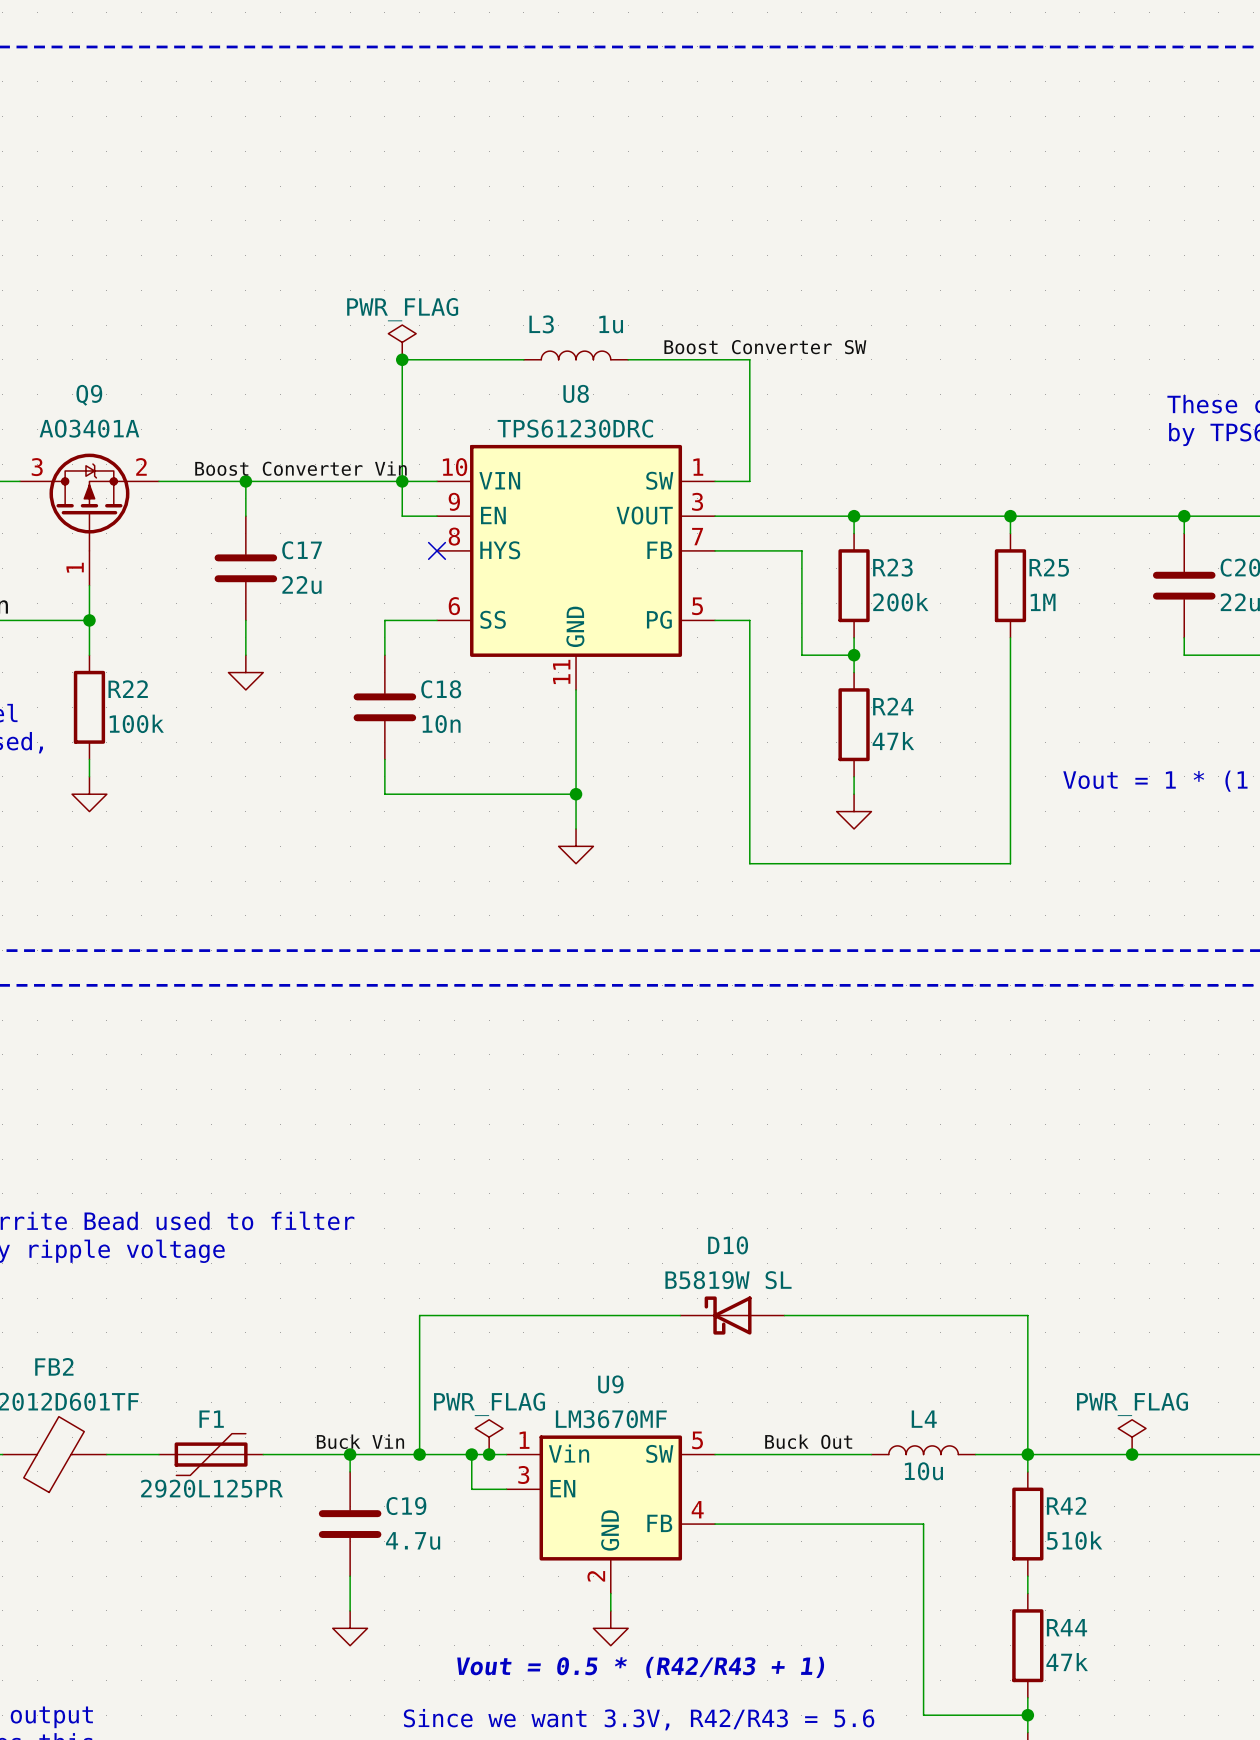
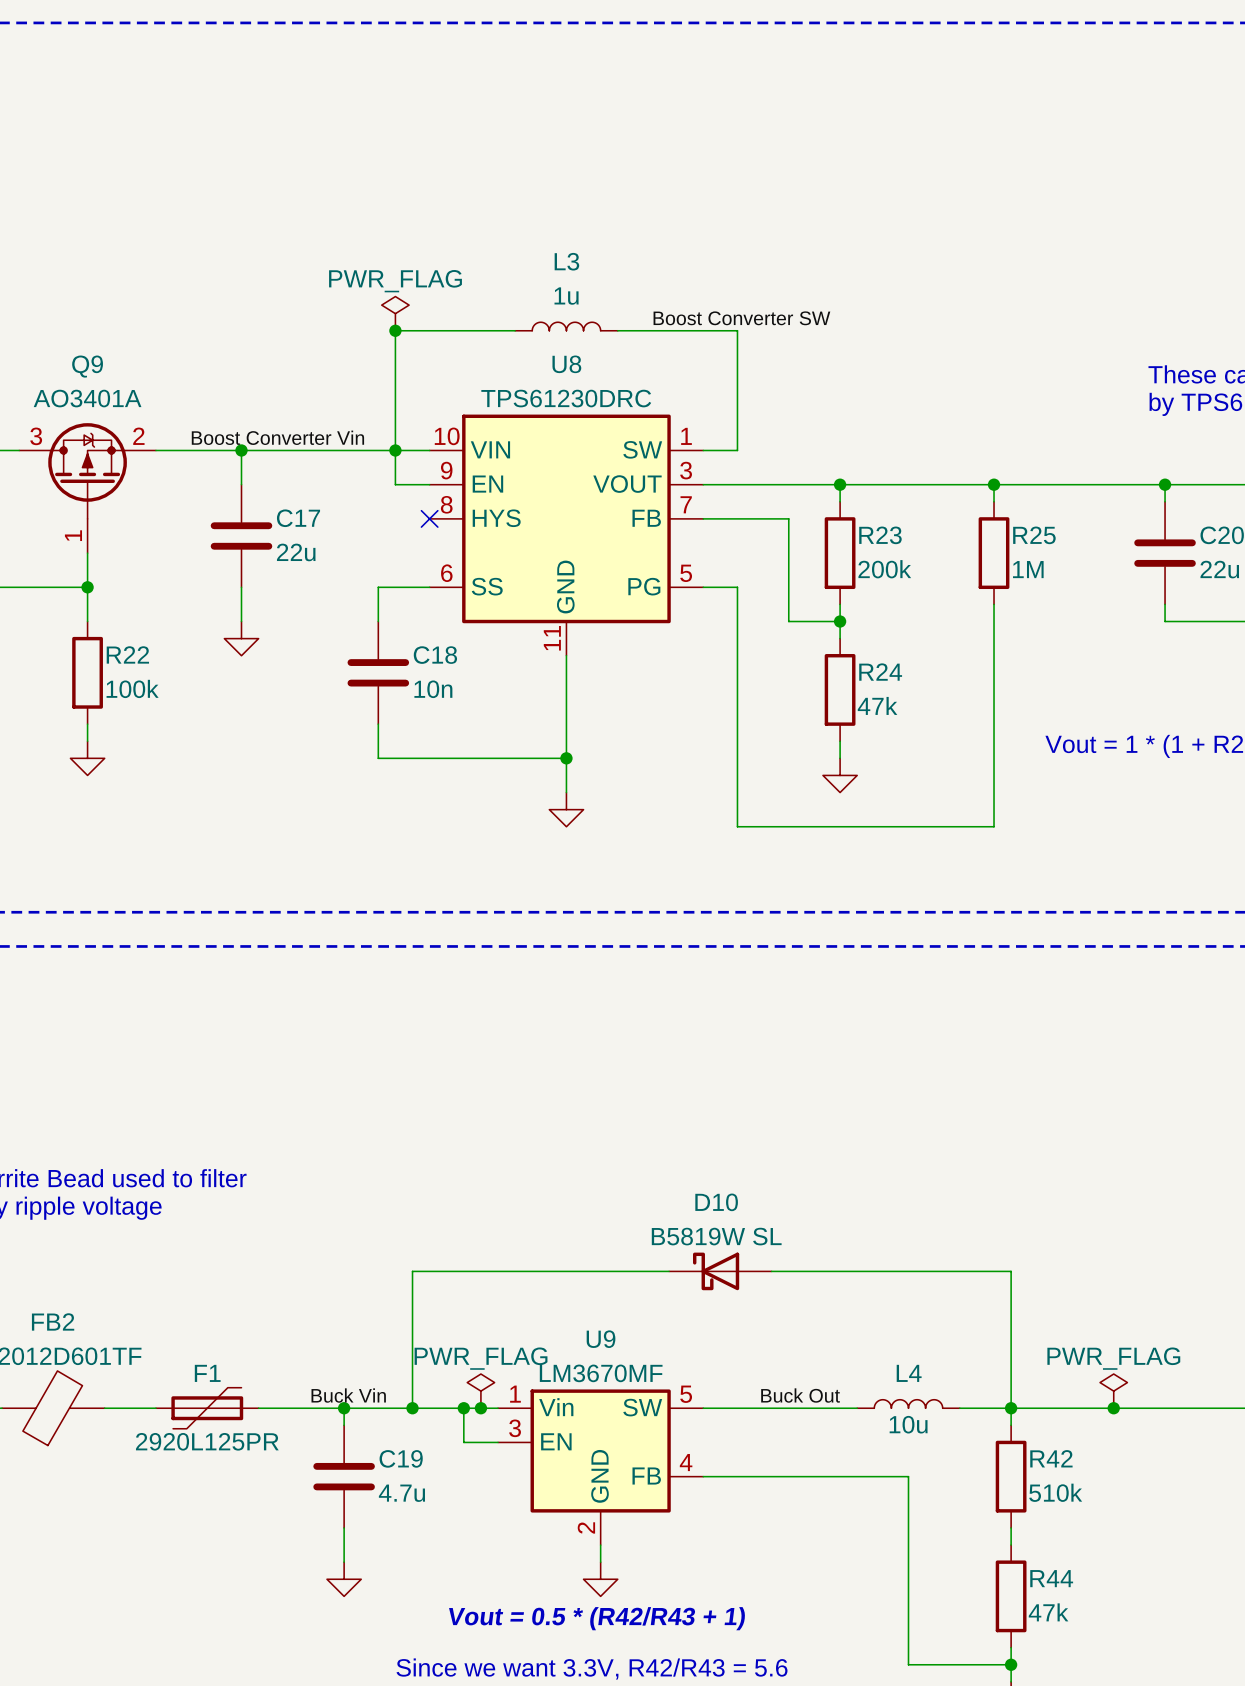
L3 name position: L3 (541, 324) -> L3 (566, 261)
L3 value position: 1u (611, 324) -> 1u (566, 296)

